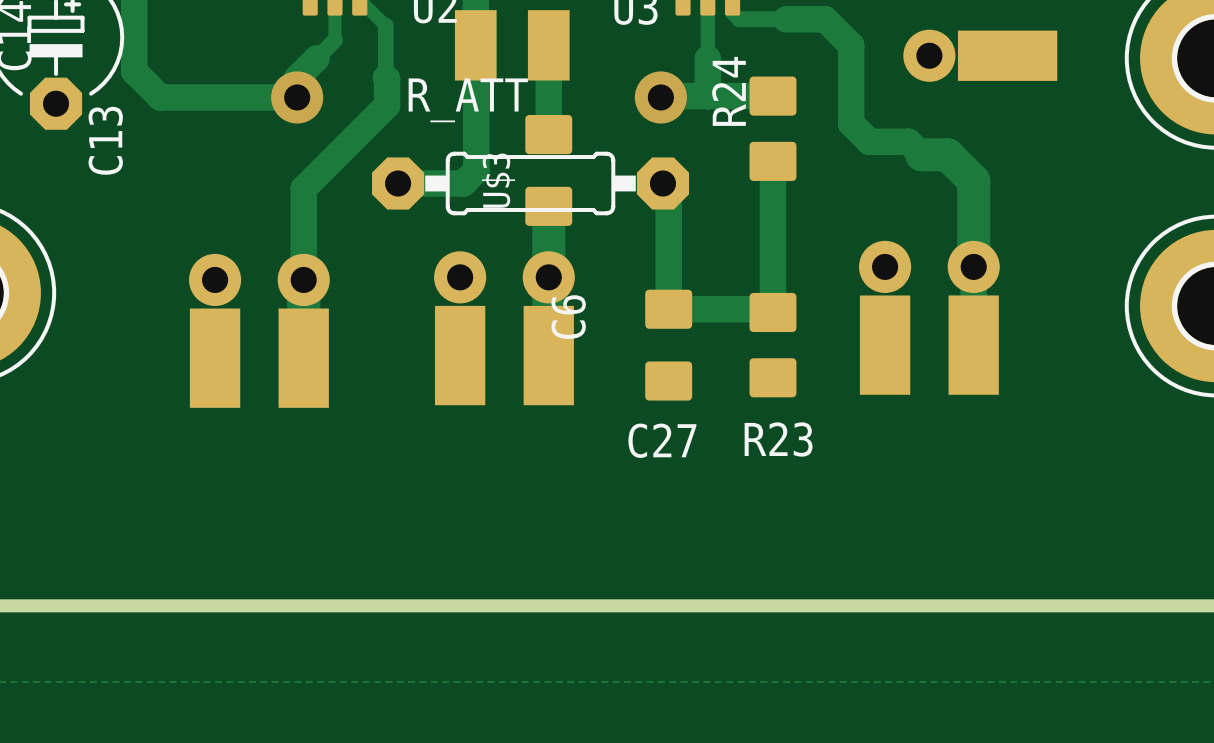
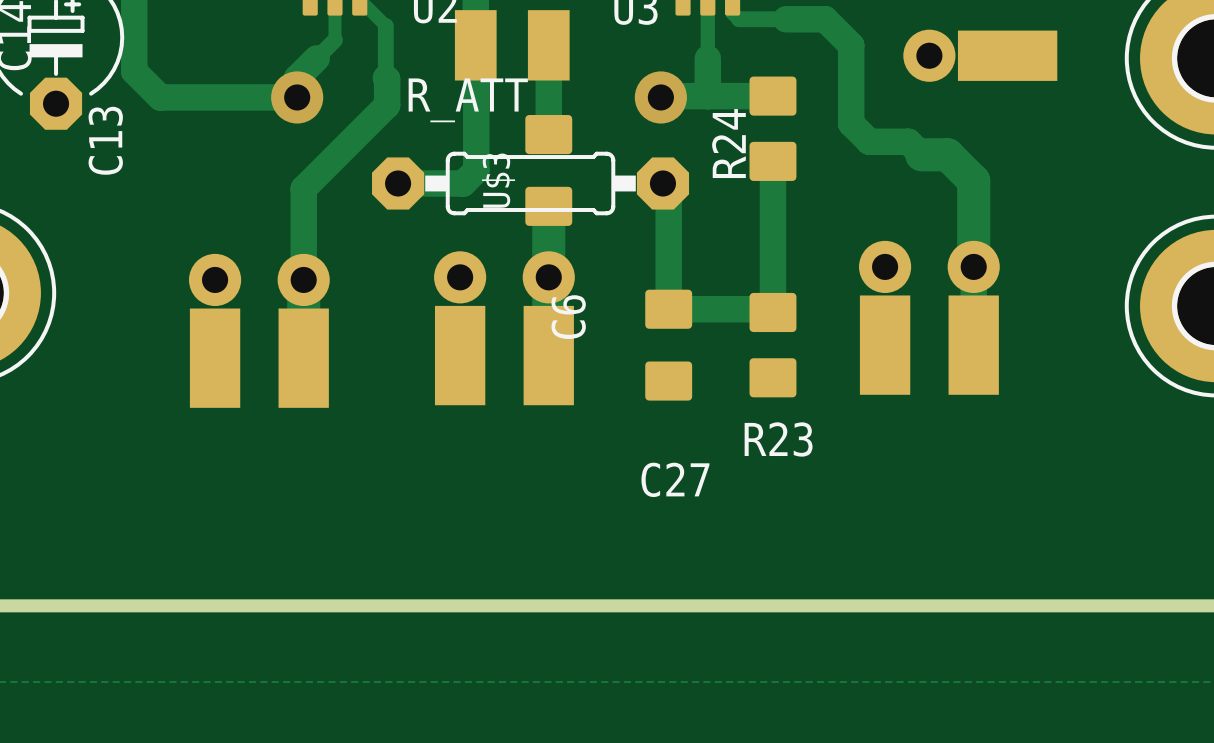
R24 name position: R24 (728, 91) -> R24 (728, 143)
C27 name position: C27 (662, 440) -> C27 (675, 479)

